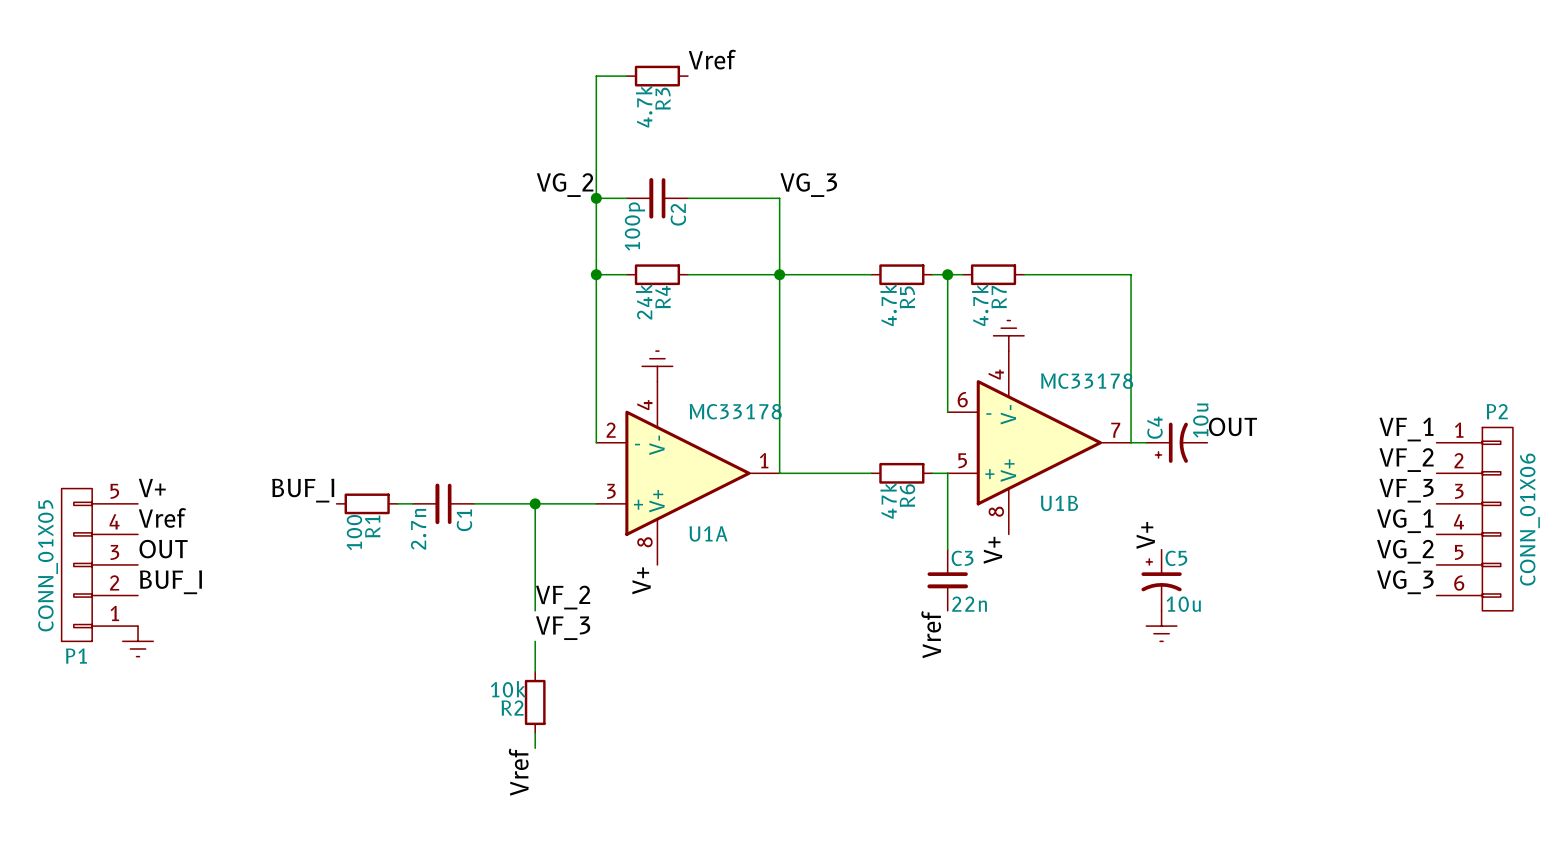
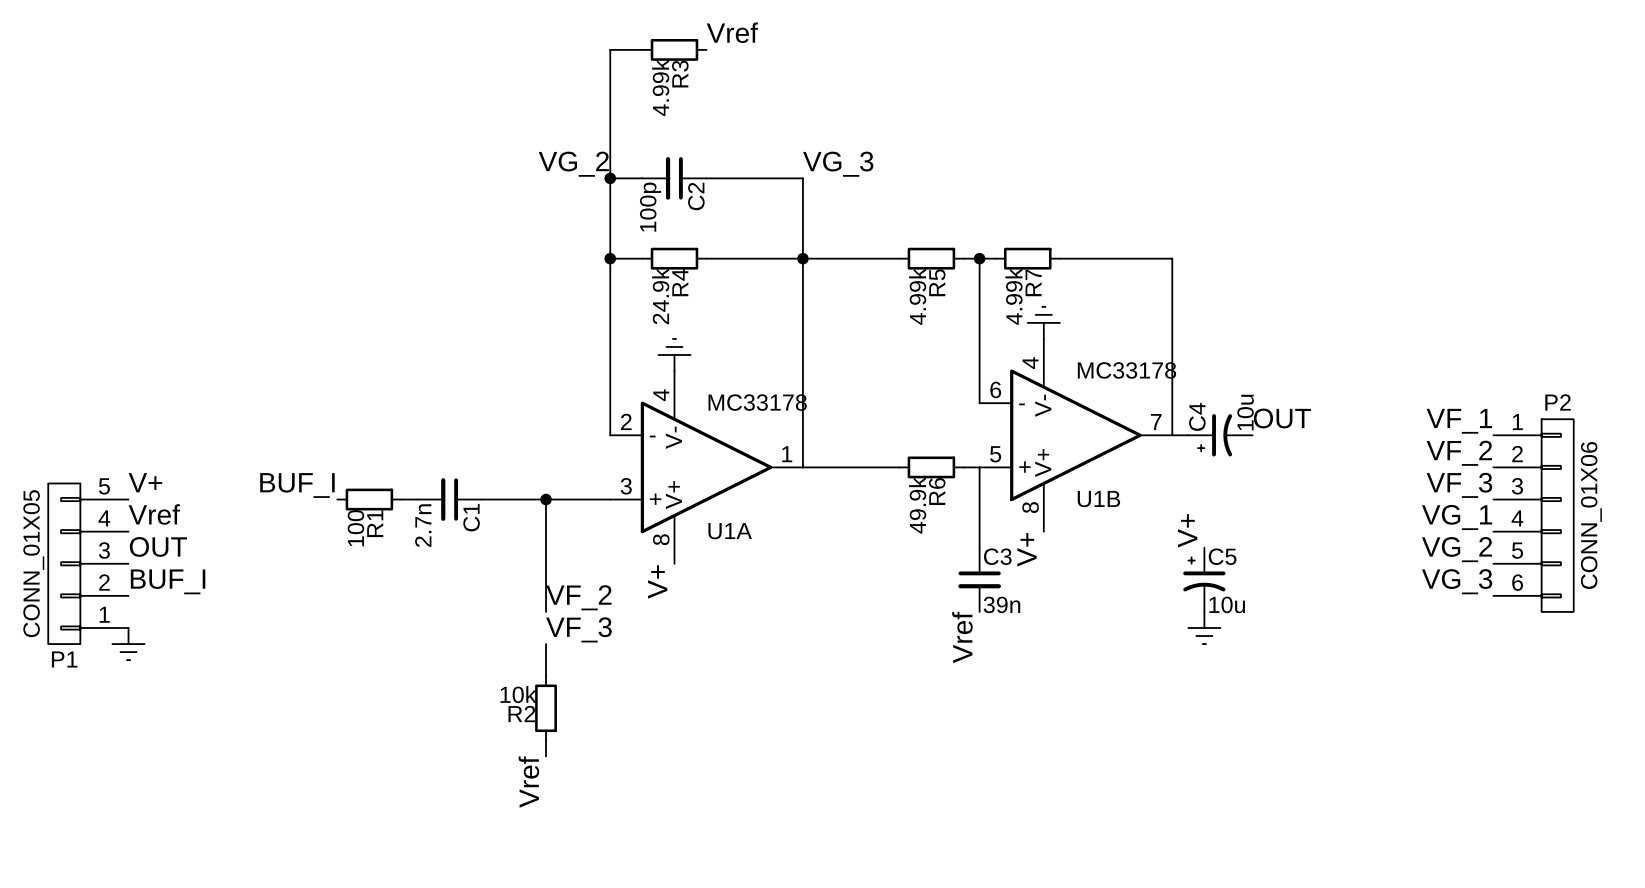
R3 value: 4.7k (644, 106) -> 4.99k (660, 87)
R4 value: 24k (644, 301) -> 24.9k (660, 296)
R5 value: 4.7k (888, 304) -> 4.99k (917, 296)
R7 value: 4.7k (980, 304) -> 4.99k (1014, 296)
R6 value: 47k (888, 500) -> 49.9k (917, 505)
C3 value: 22n (969, 604) -> 39n (1001, 604)

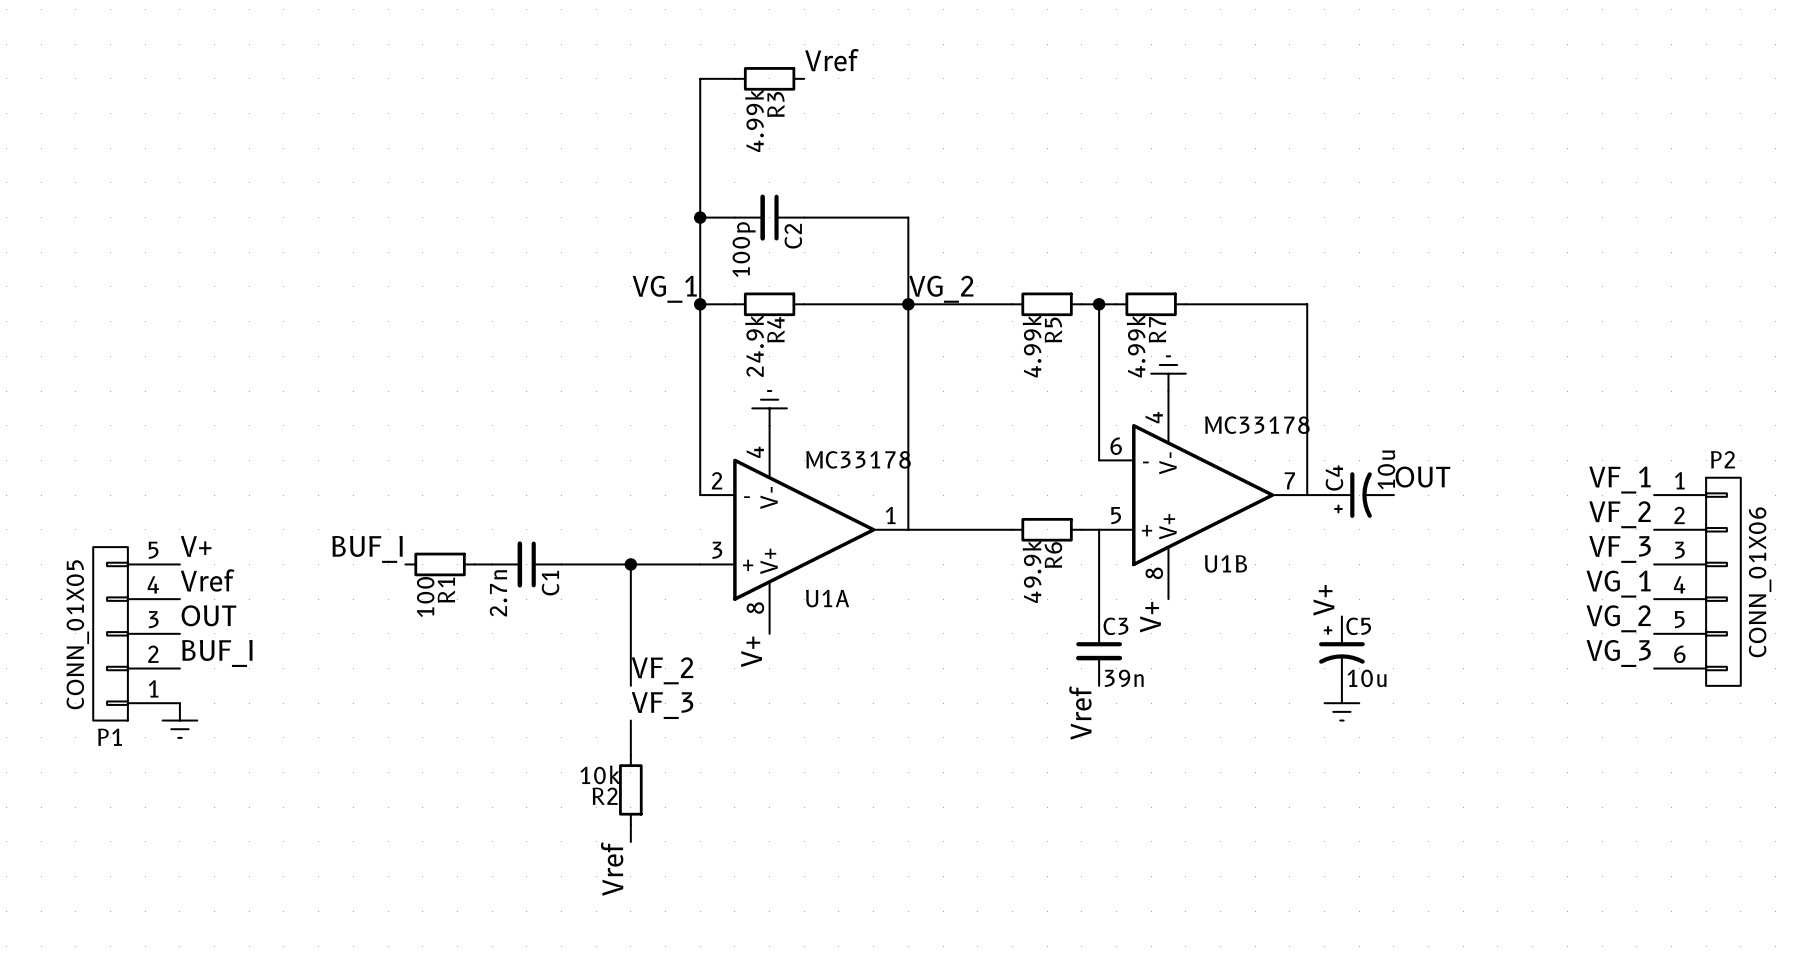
label position: VG_2 (573, 164) -> VG_2 (941, 289)
label: VG_3 (838, 164) -> none
label: none -> VG_1 (664, 289)

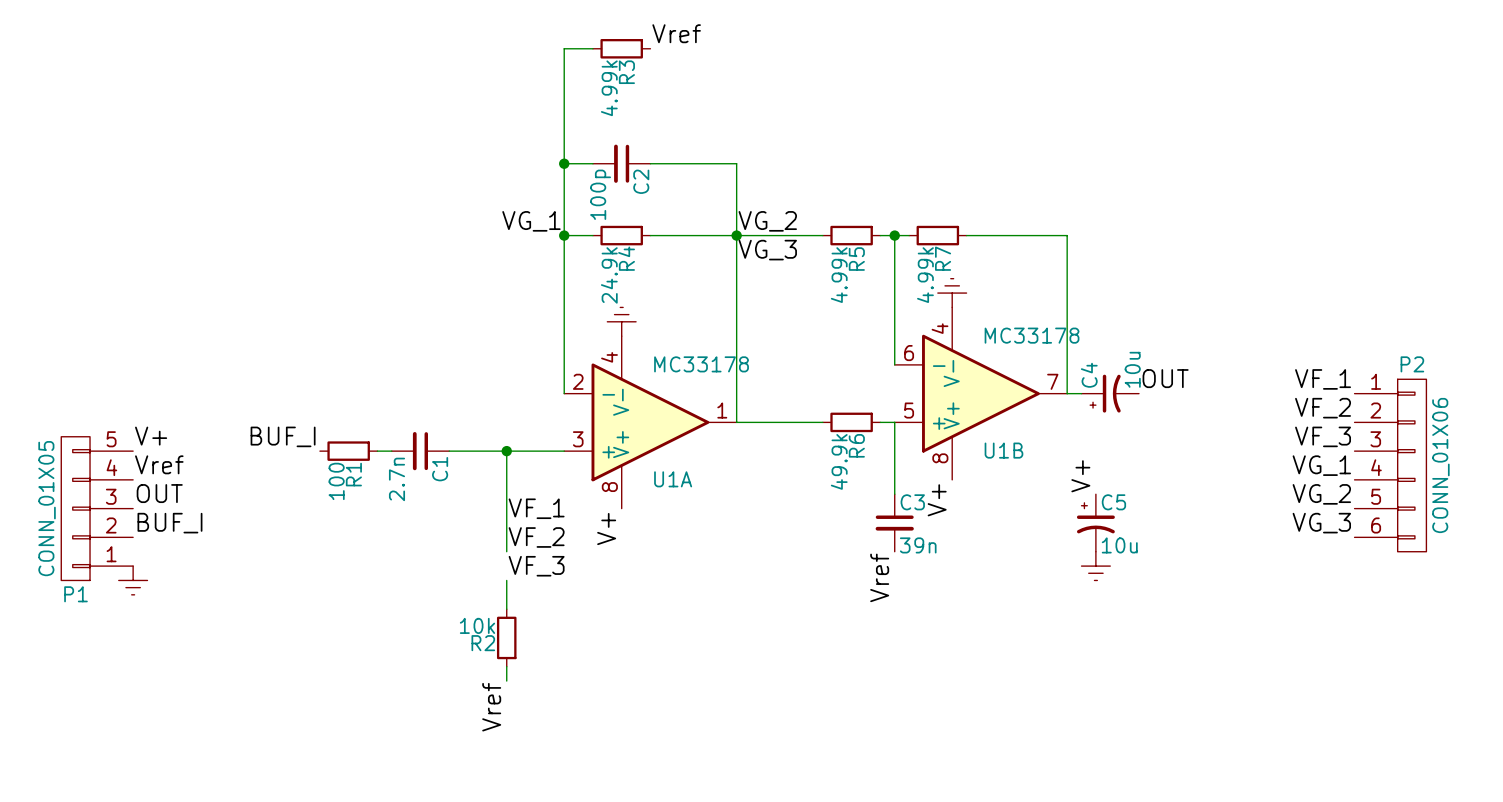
label: none -> VG_3 (767, 250)
label: none -> VF_1 (536, 508)

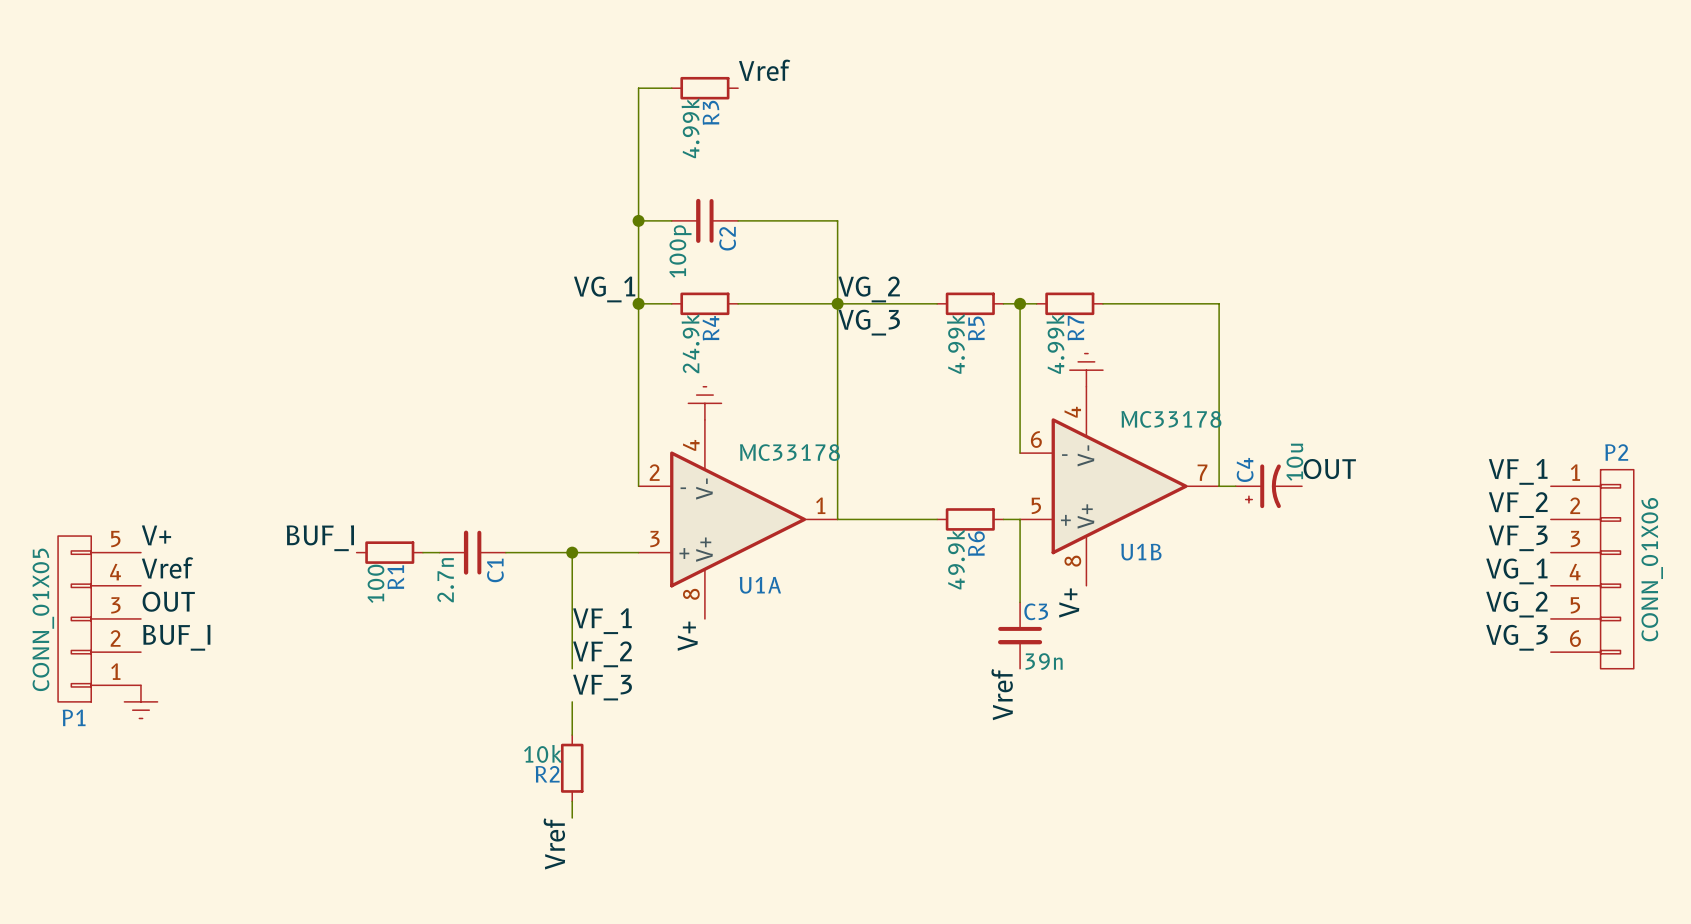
label: V+ (1080, 476) -> none
C5: 10u (1095, 522) -> none
power symbol: (1095, 566) -> none

